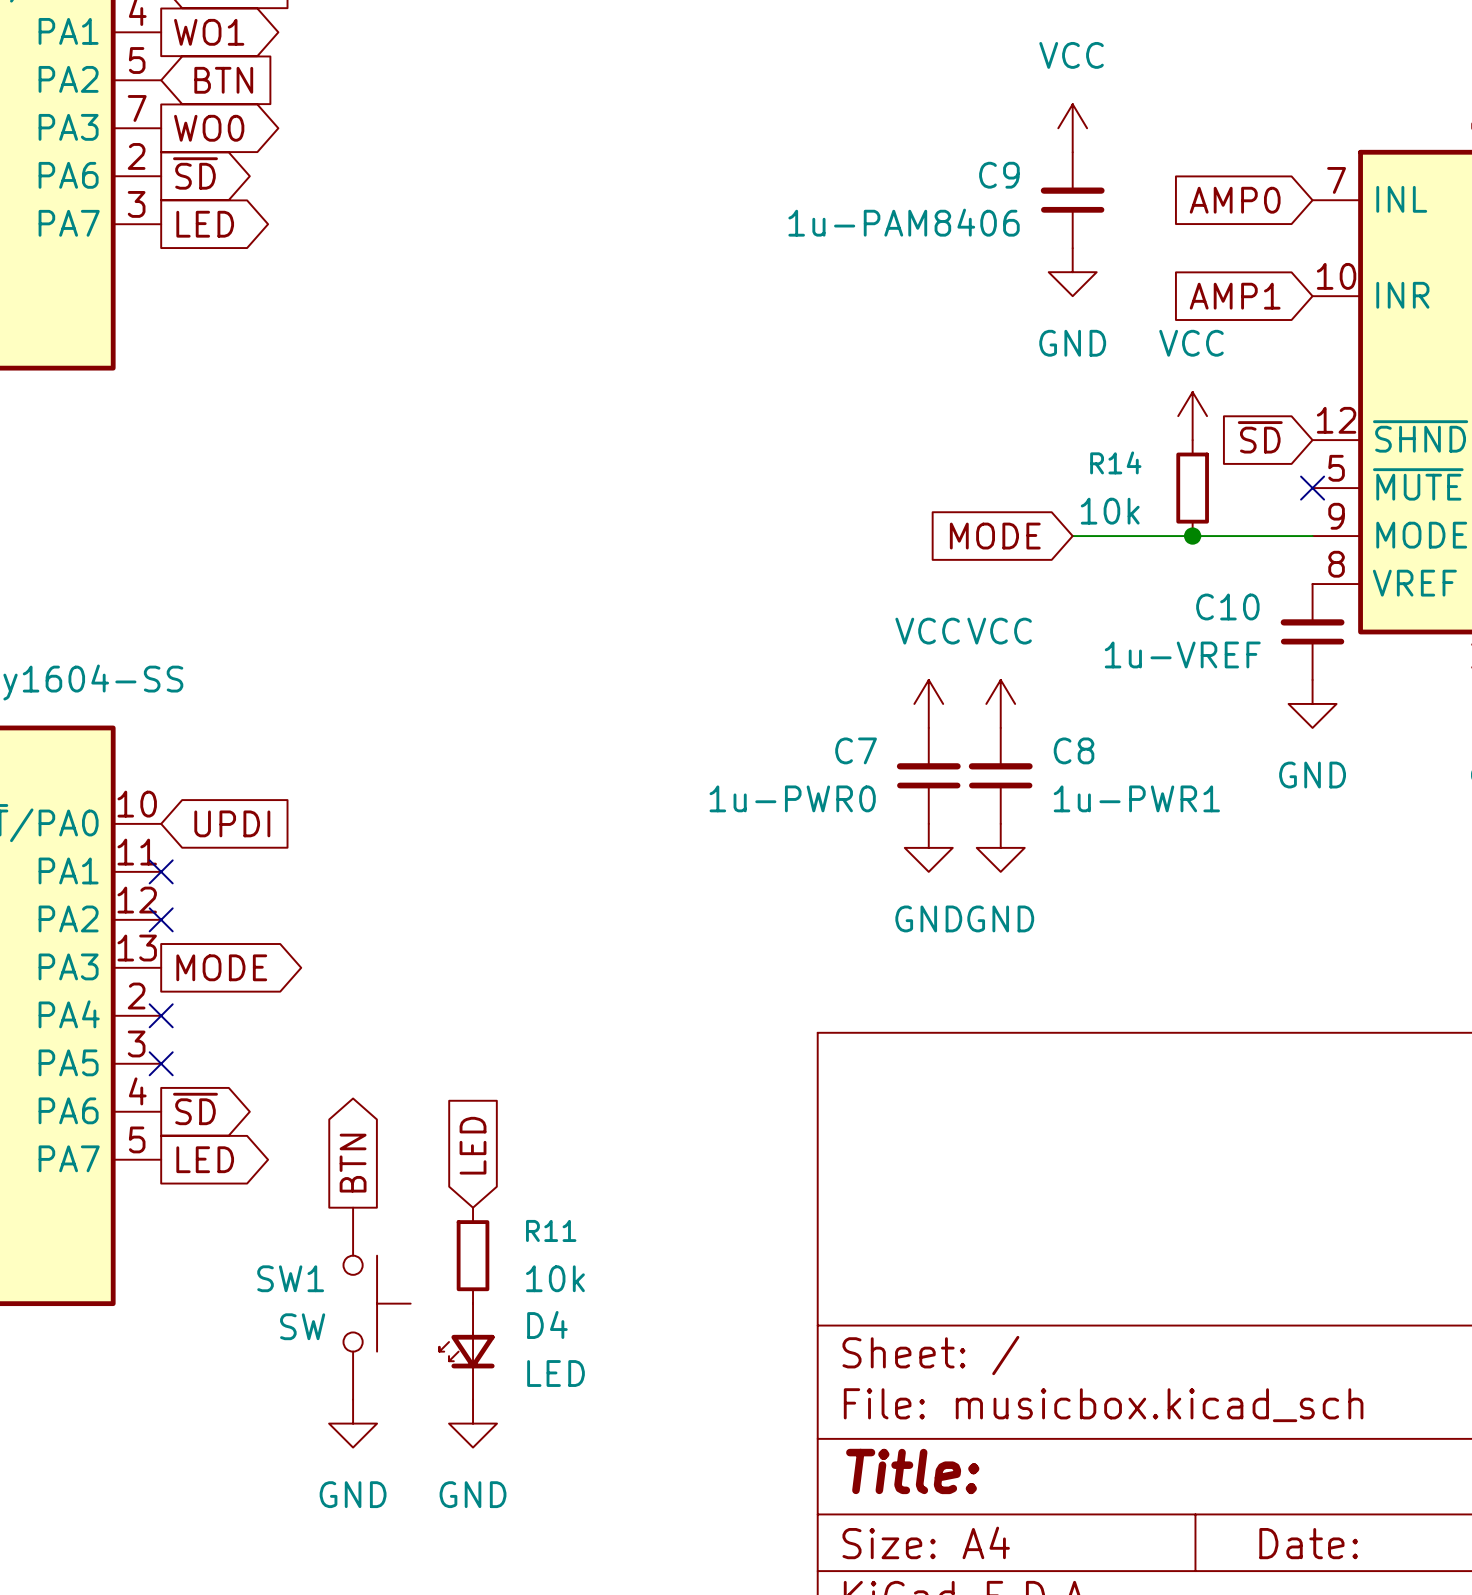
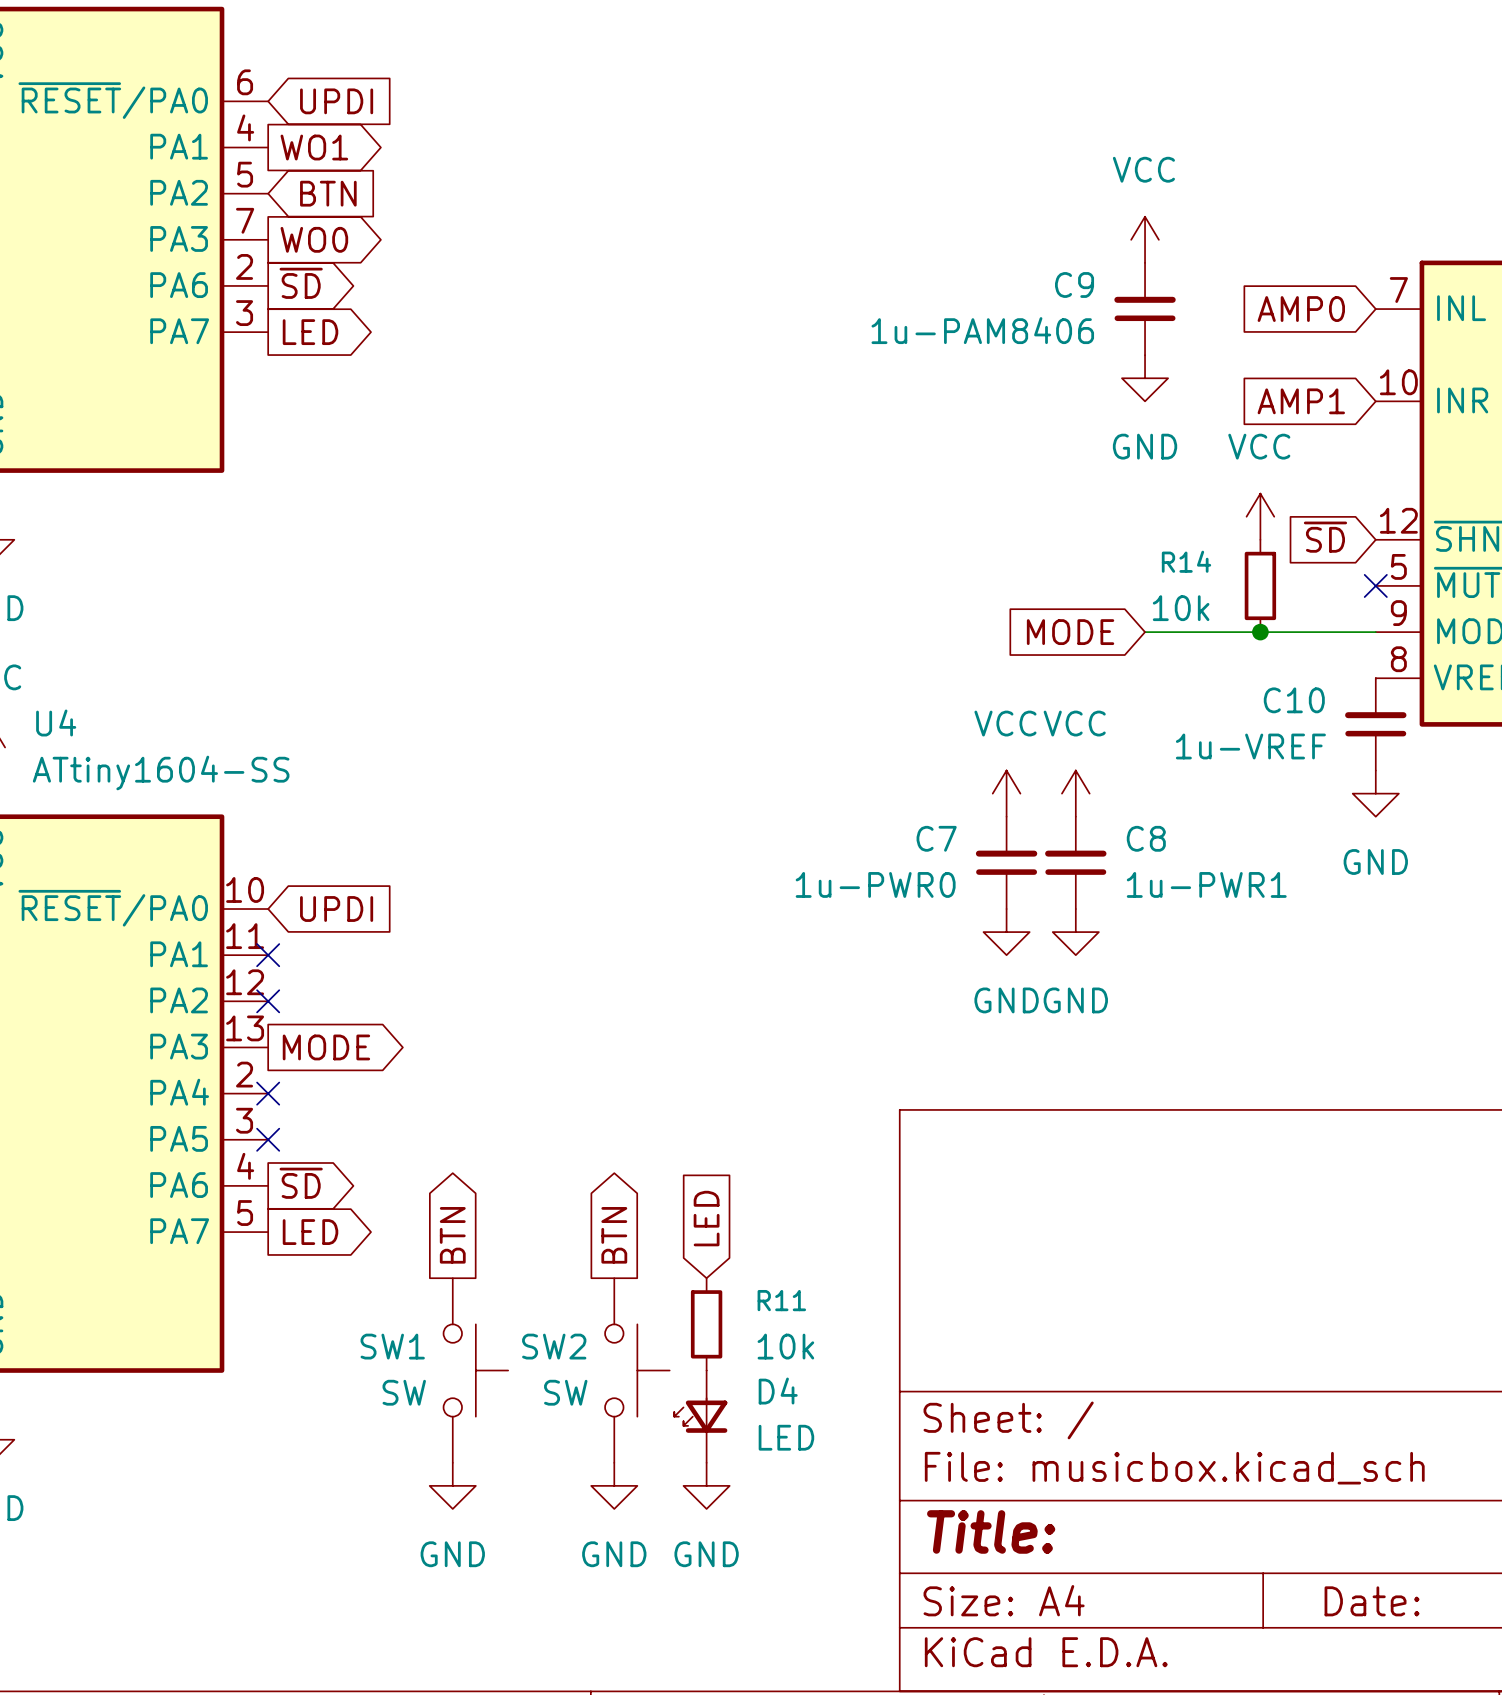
global label position: LED (473, 1145) -> LED (706, 1218)
global label: none -> BTN (614, 1235)
R11 position: (473, 1255) -> (706, 1324)
SW2: none -> SW (637, 1370)
D4 position: (467, 1351) -> (700, 1416)
power symbol position: GND (473, 1423) -> GND (614, 1485)
power symbol: none -> GND (706, 1485)

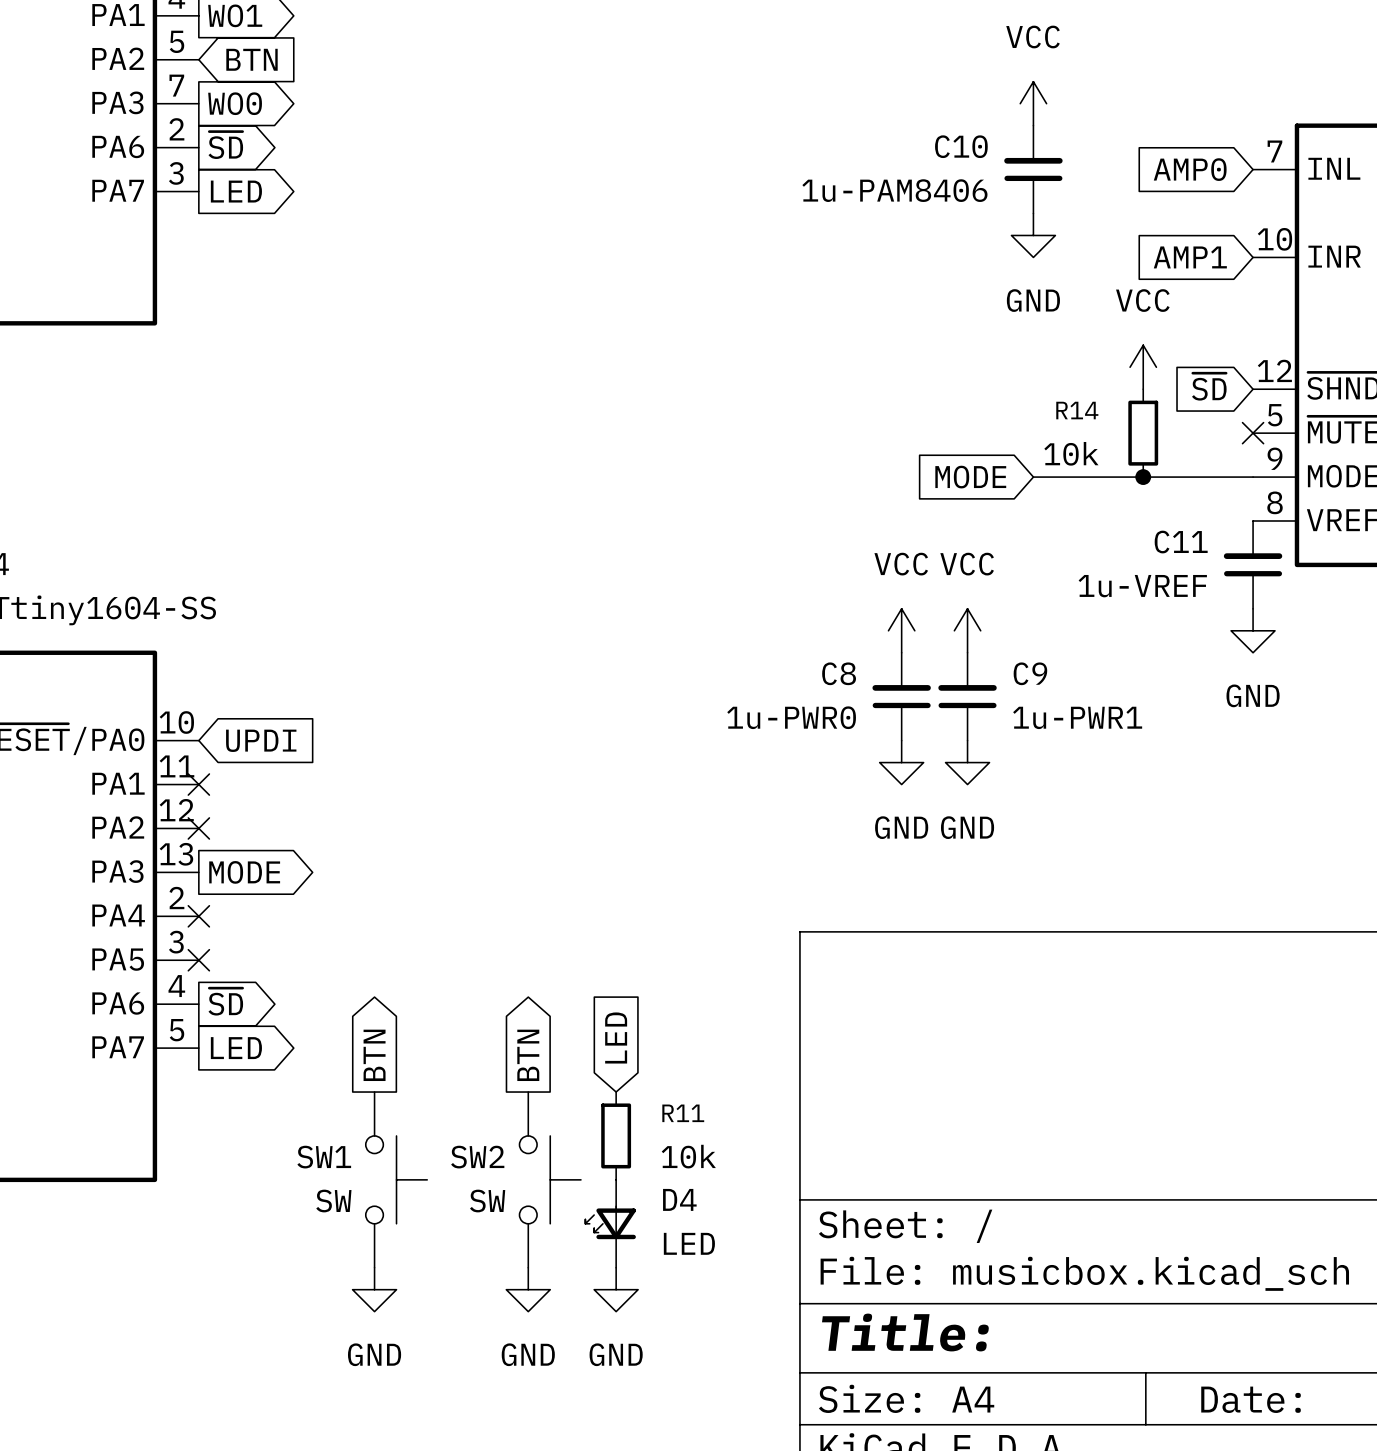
C9 name: C9 (1074, 284) -> C10 (961, 146)
C10 name: C10 (1294, 700) -> C11 (1181, 542)
C7 name: C7 (936, 838) -> C8 (839, 673)
C8 name: C8 (1146, 838) -> C9 (1030, 673)

